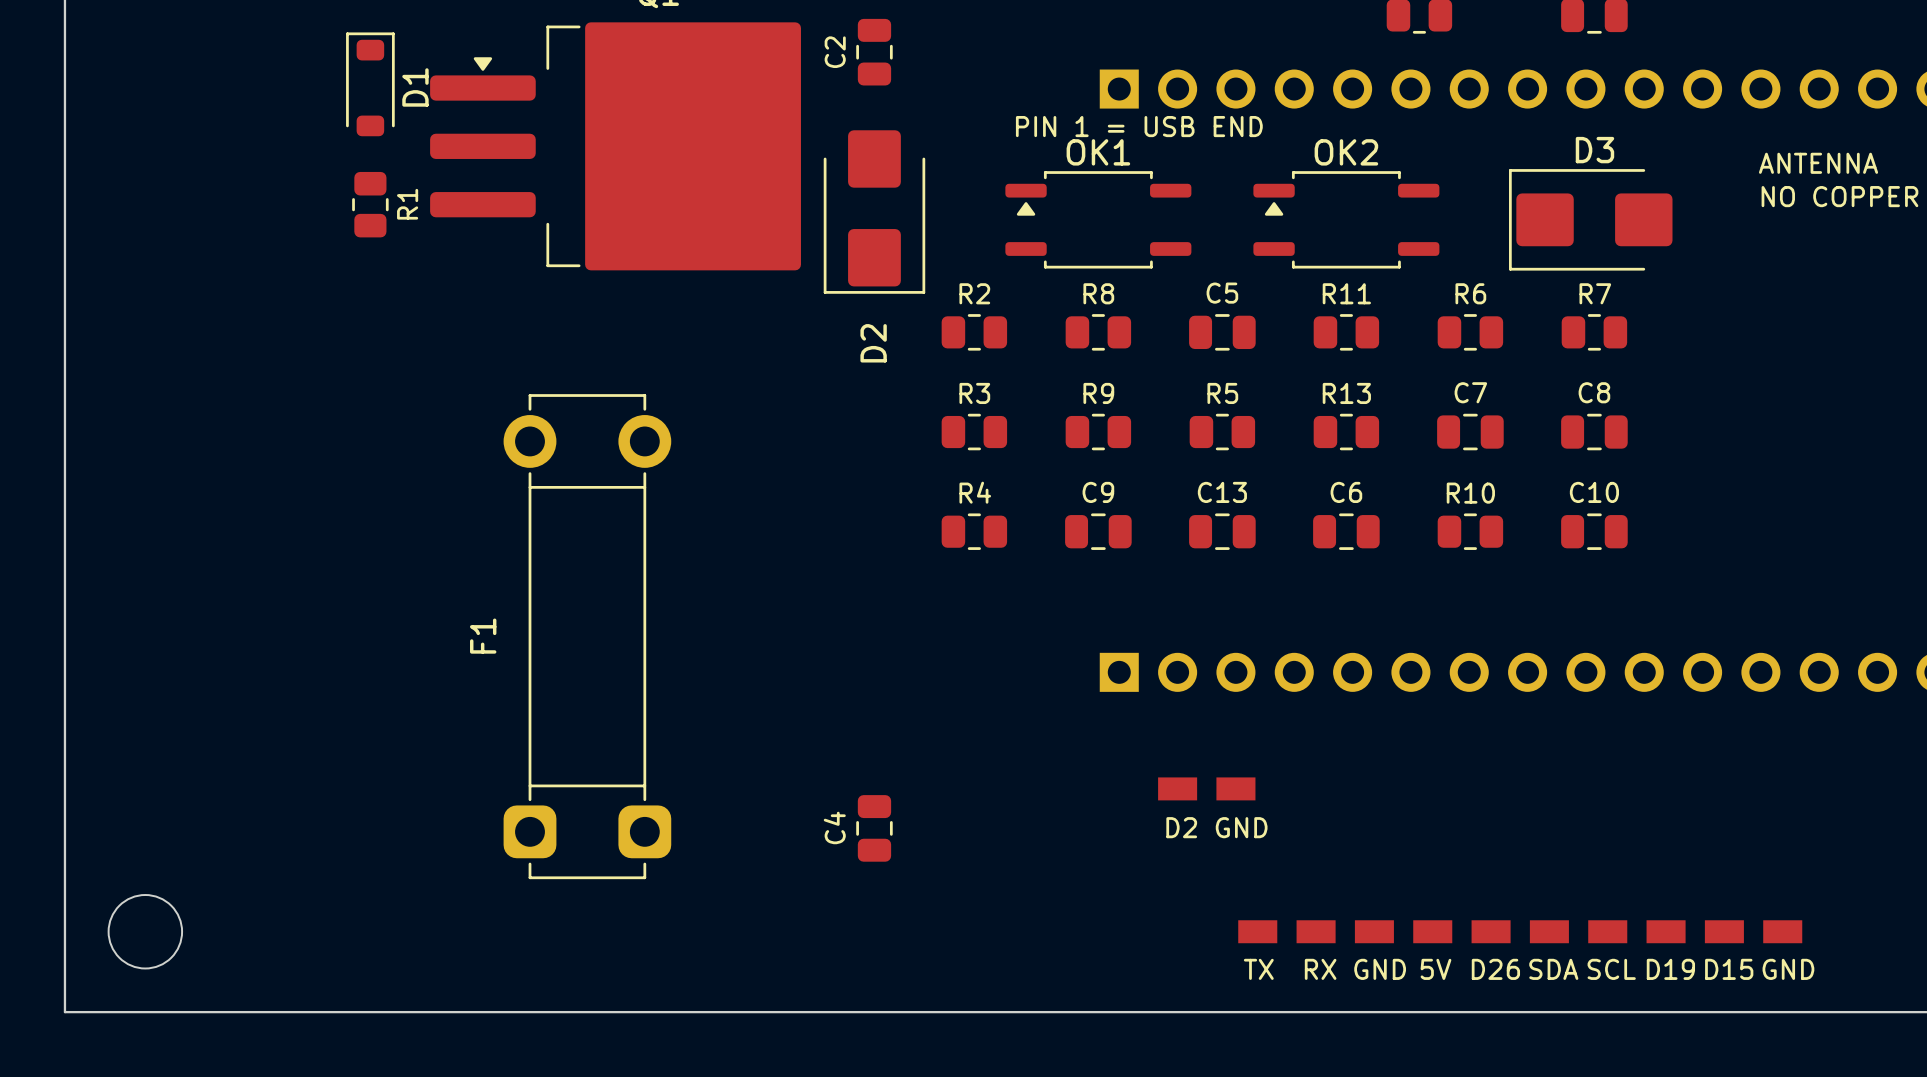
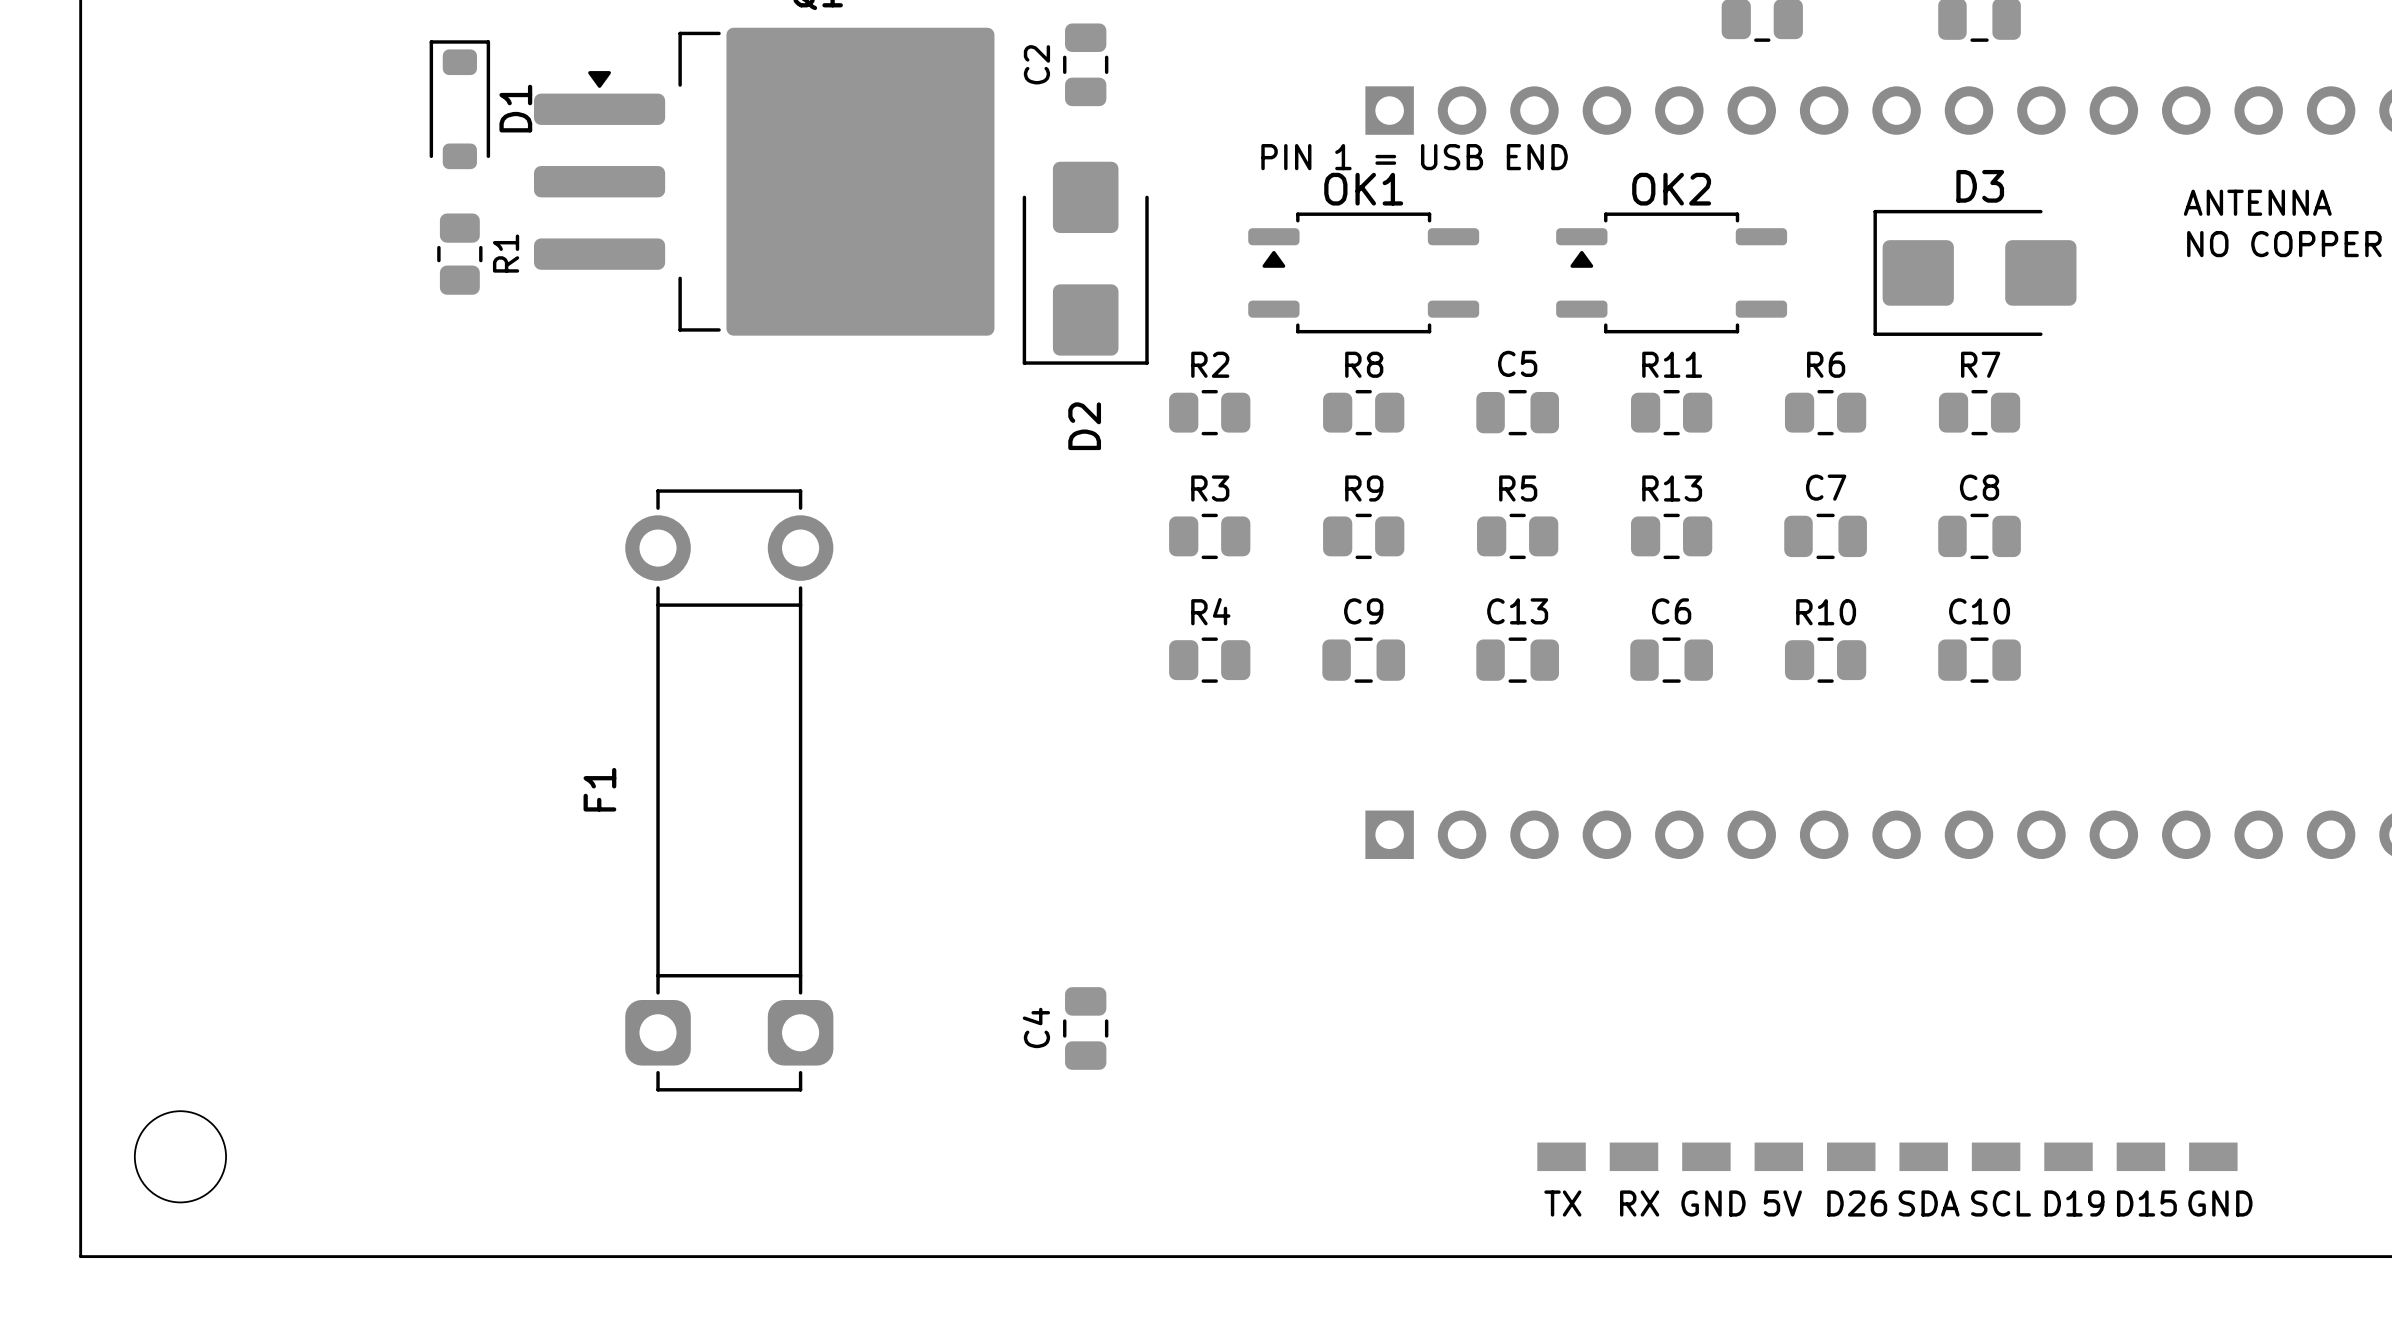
part: (1206, 788) -> none
text: D2 (1181, 827) -> none
text: GND (1241, 827) -> none

